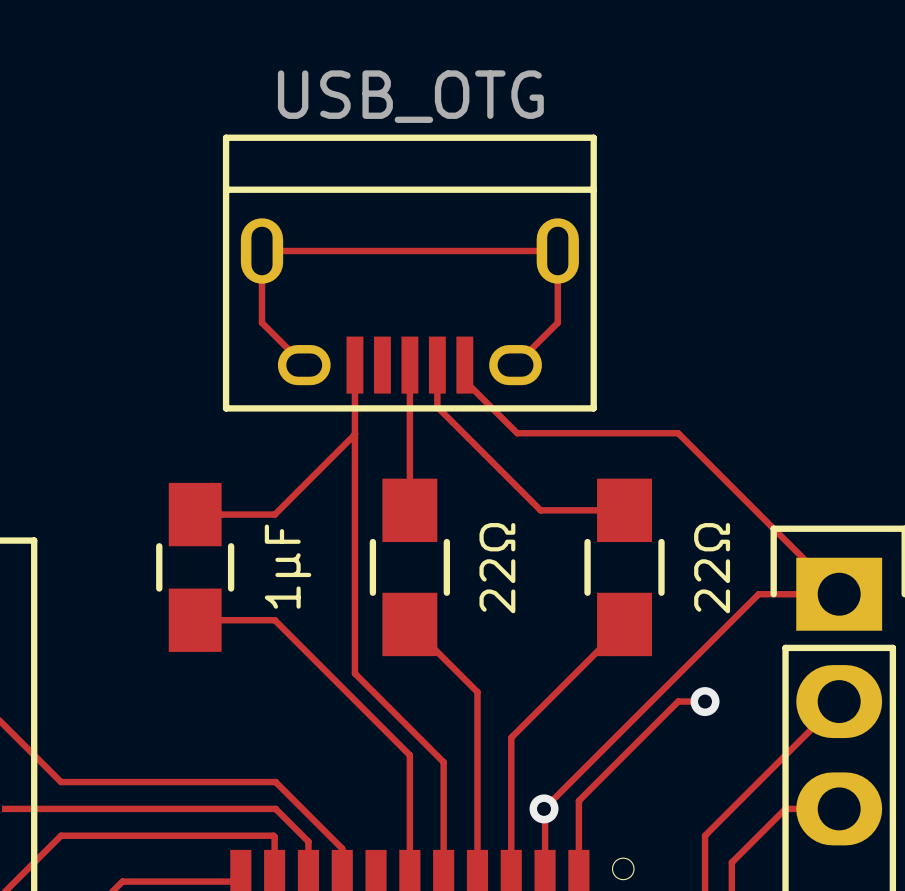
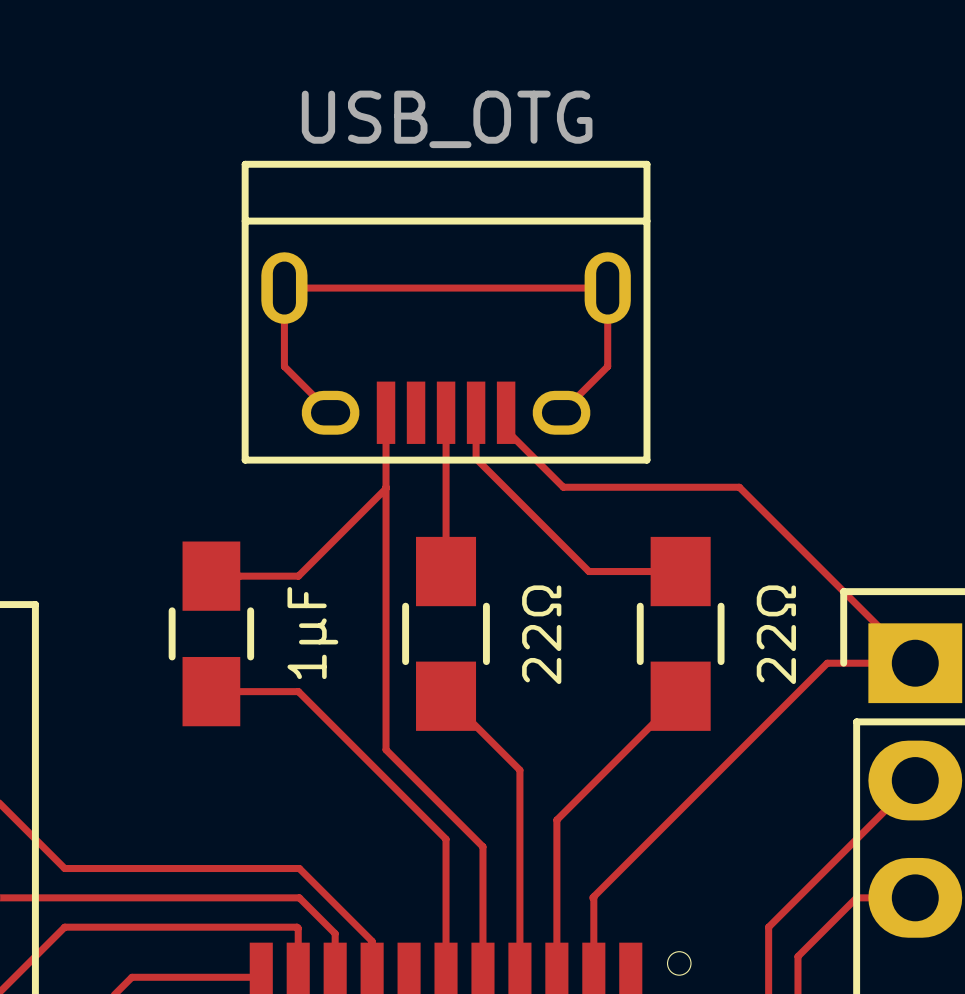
track: (705, 701) (678, 701) (578, 800) (578, 881) -> none
via: (705, 701) -> none
via: (544, 808) -> none

